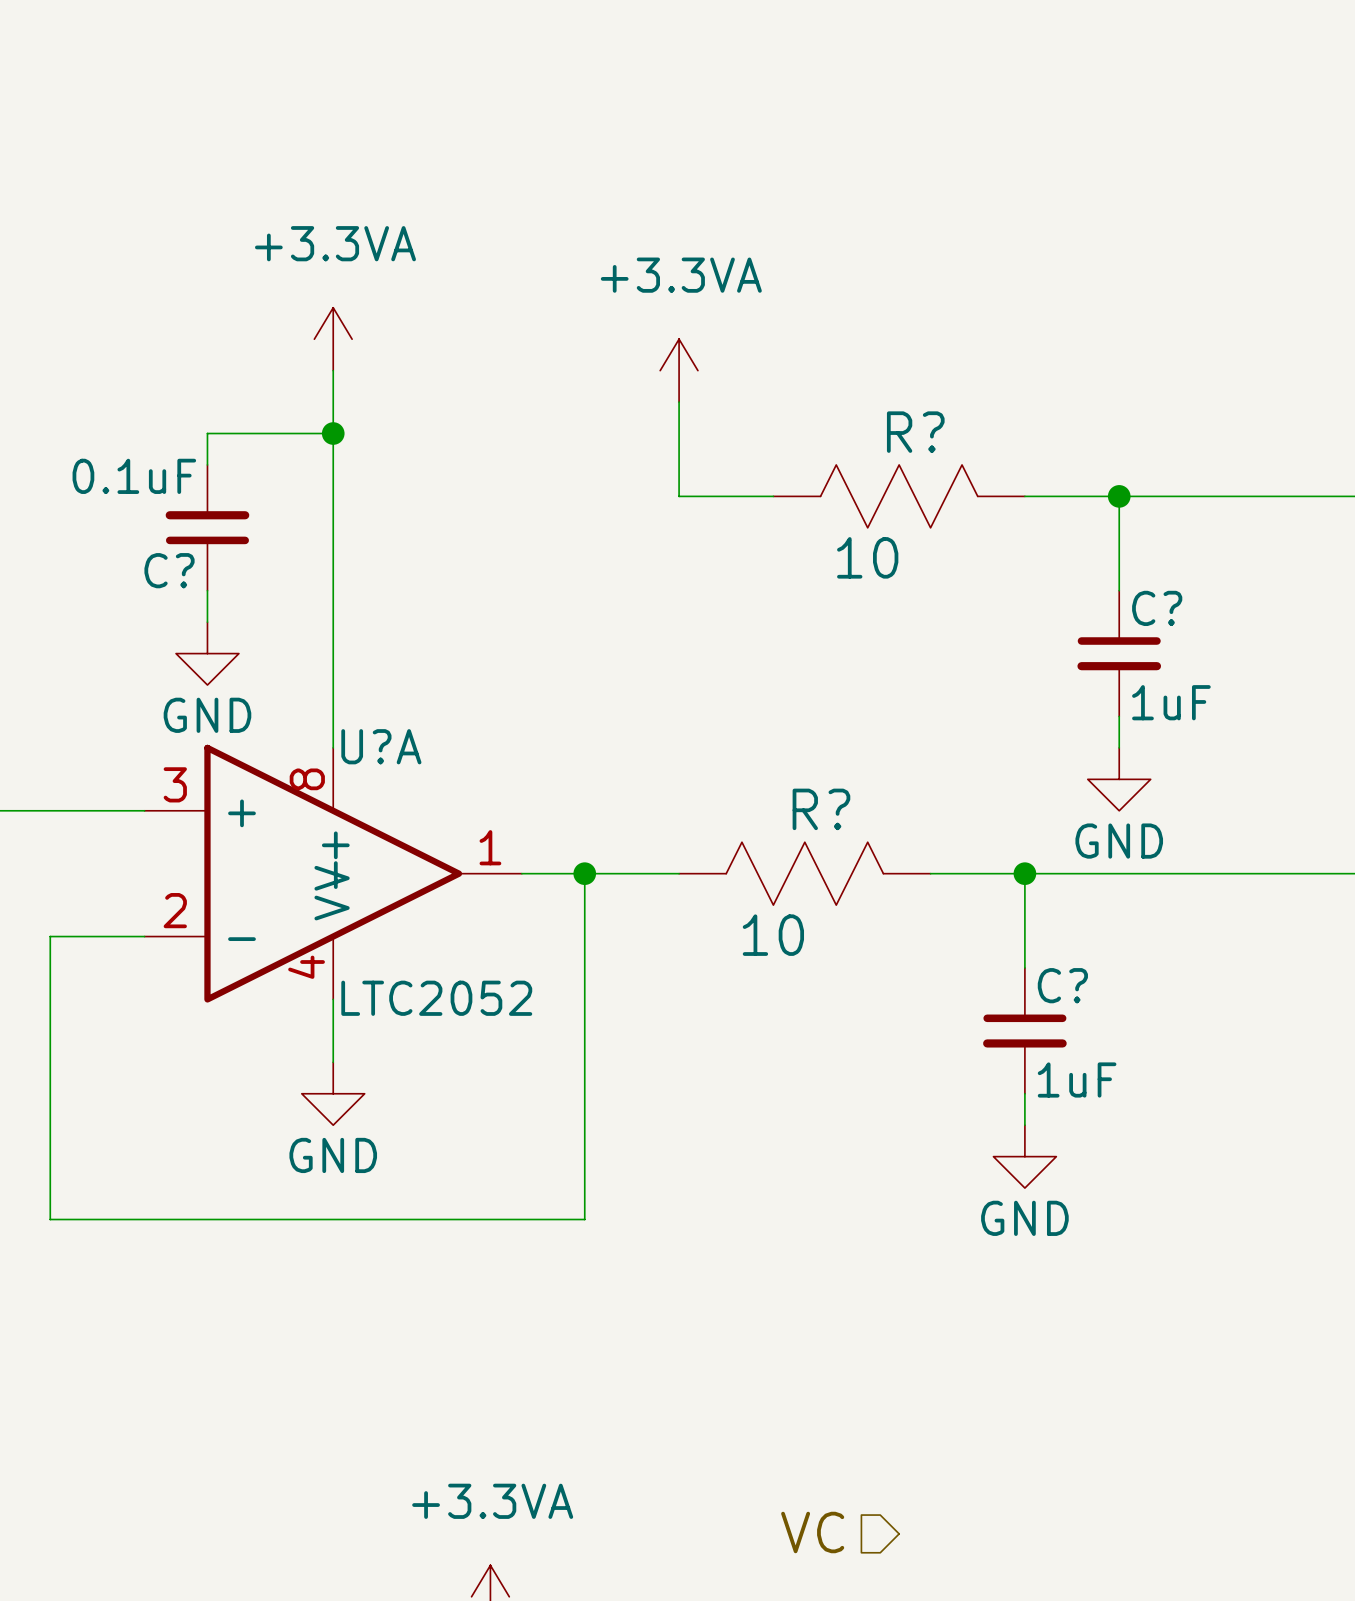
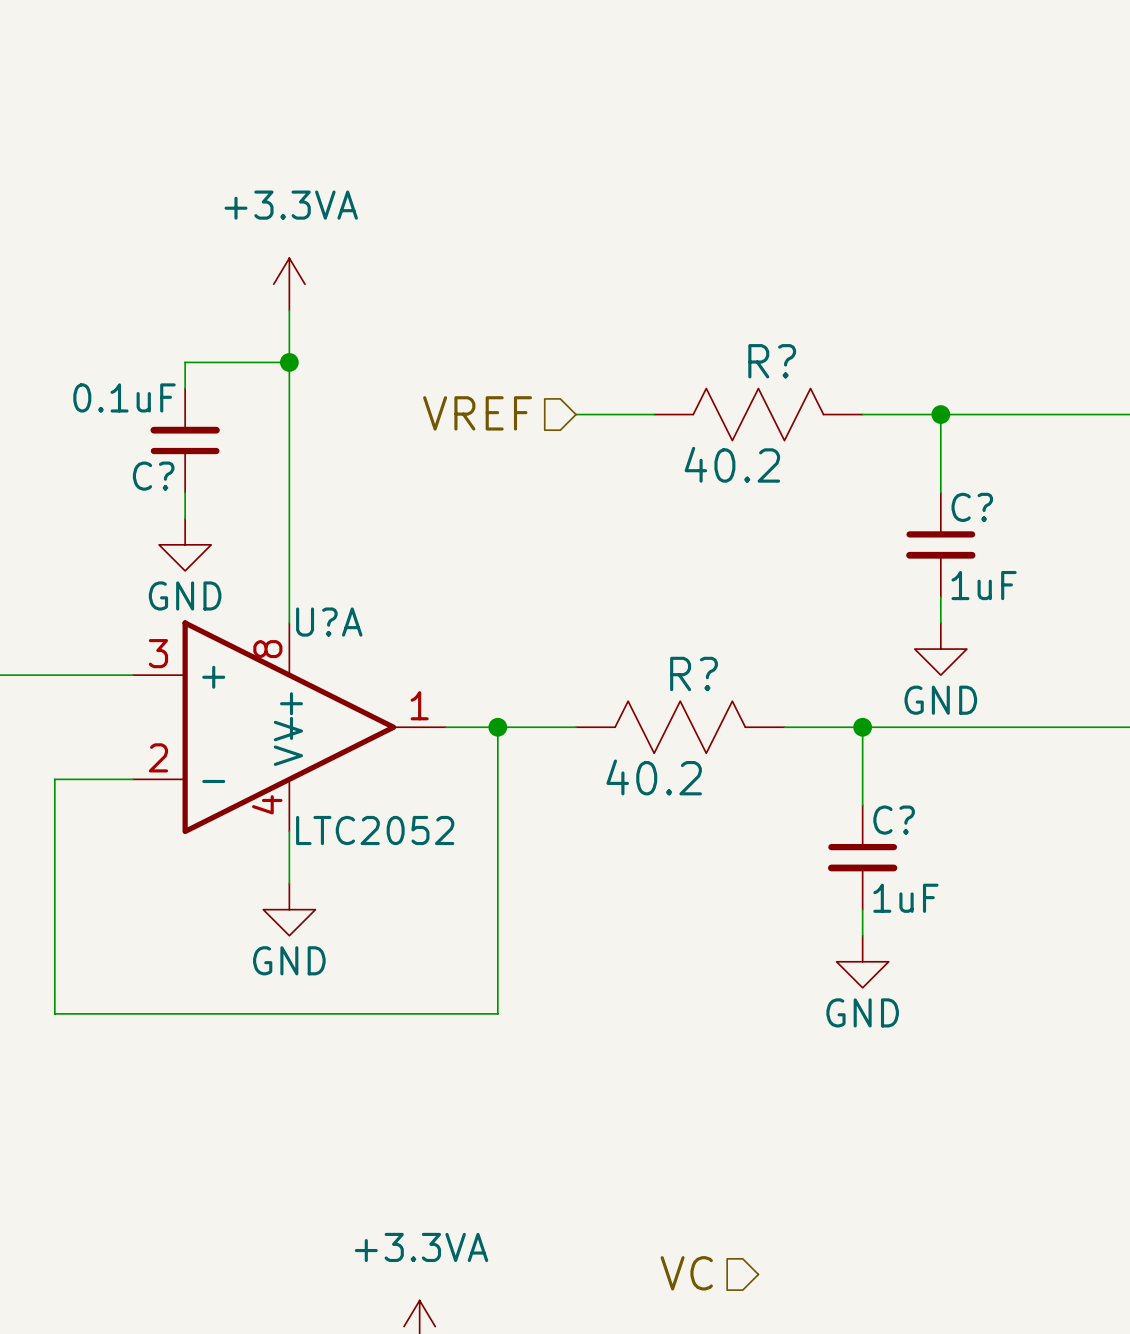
power symbol: +3.3VA (679, 370) -> none
wire: (679, 402) (679, 496) -> none
hierarchical label: none -> VREF (477, 413)
R? value: 10 (867, 557) -> 40.2 (732, 464)
R? value: 10 (773, 935) -> 40.2 (654, 777)

